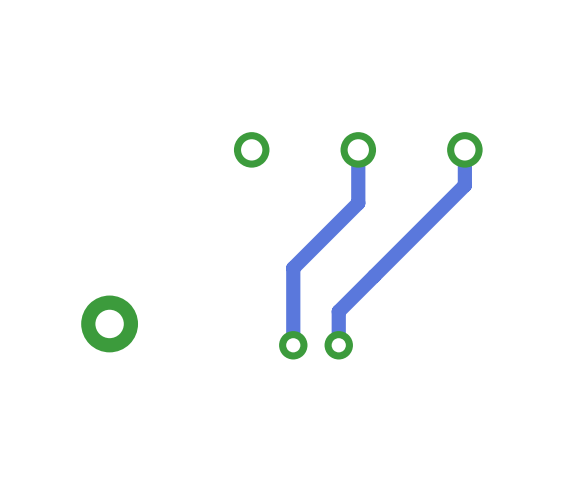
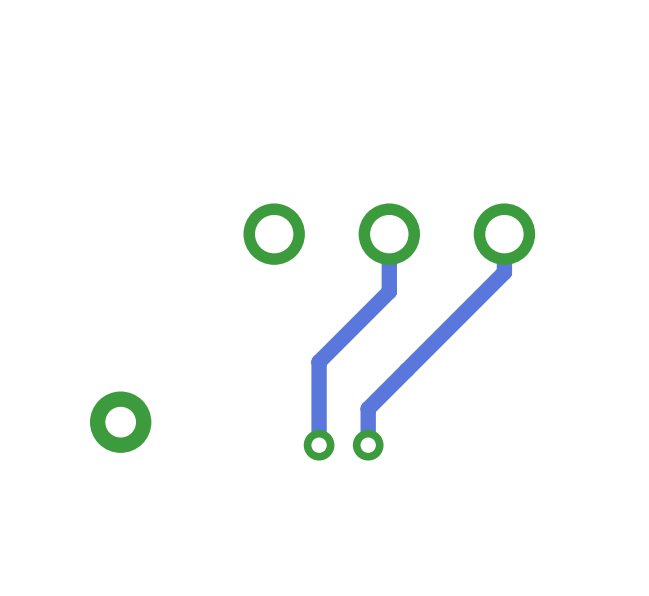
via size: [233, 132, 270, 168] -> [243, 203, 305, 265]
via size: [340, 132, 377, 168] -> [358, 203, 421, 265]
via size: [447, 132, 483, 168] -> [473, 203, 536, 265]

